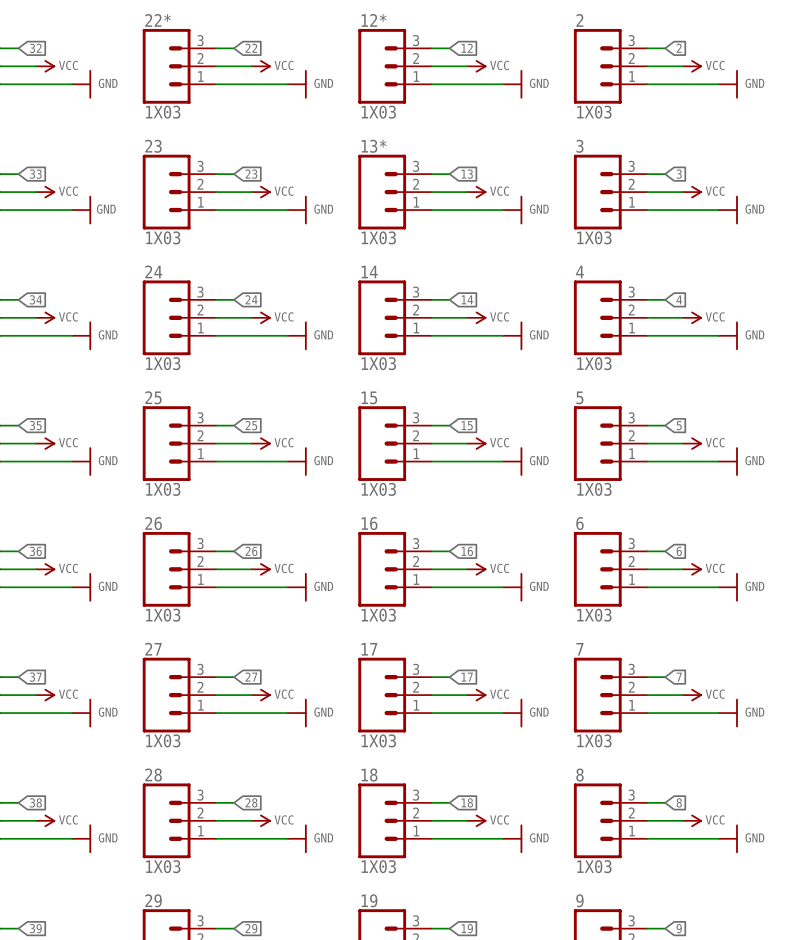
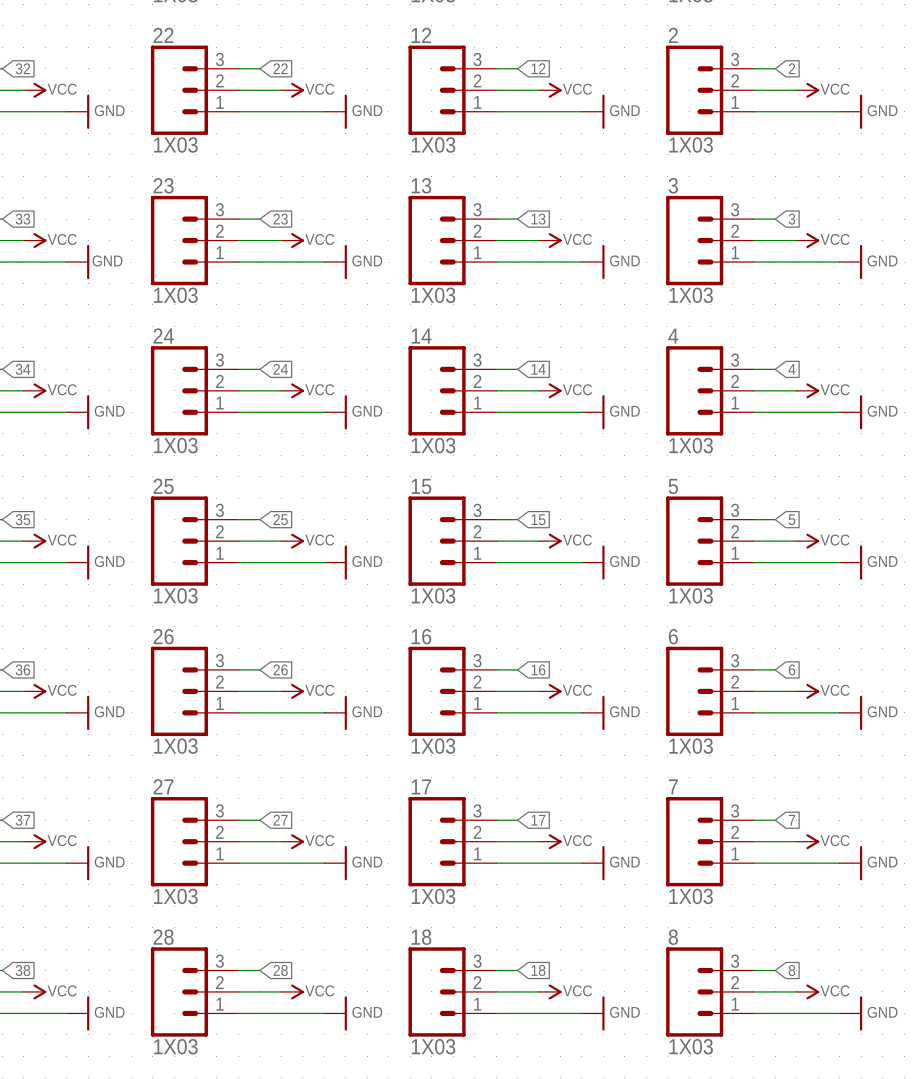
22* name: 22* (158, 20) -> 22 (163, 35)
12* name: 12* (374, 20) -> 12 (421, 35)
13* name: 13* (374, 146) -> 13 (421, 185)

